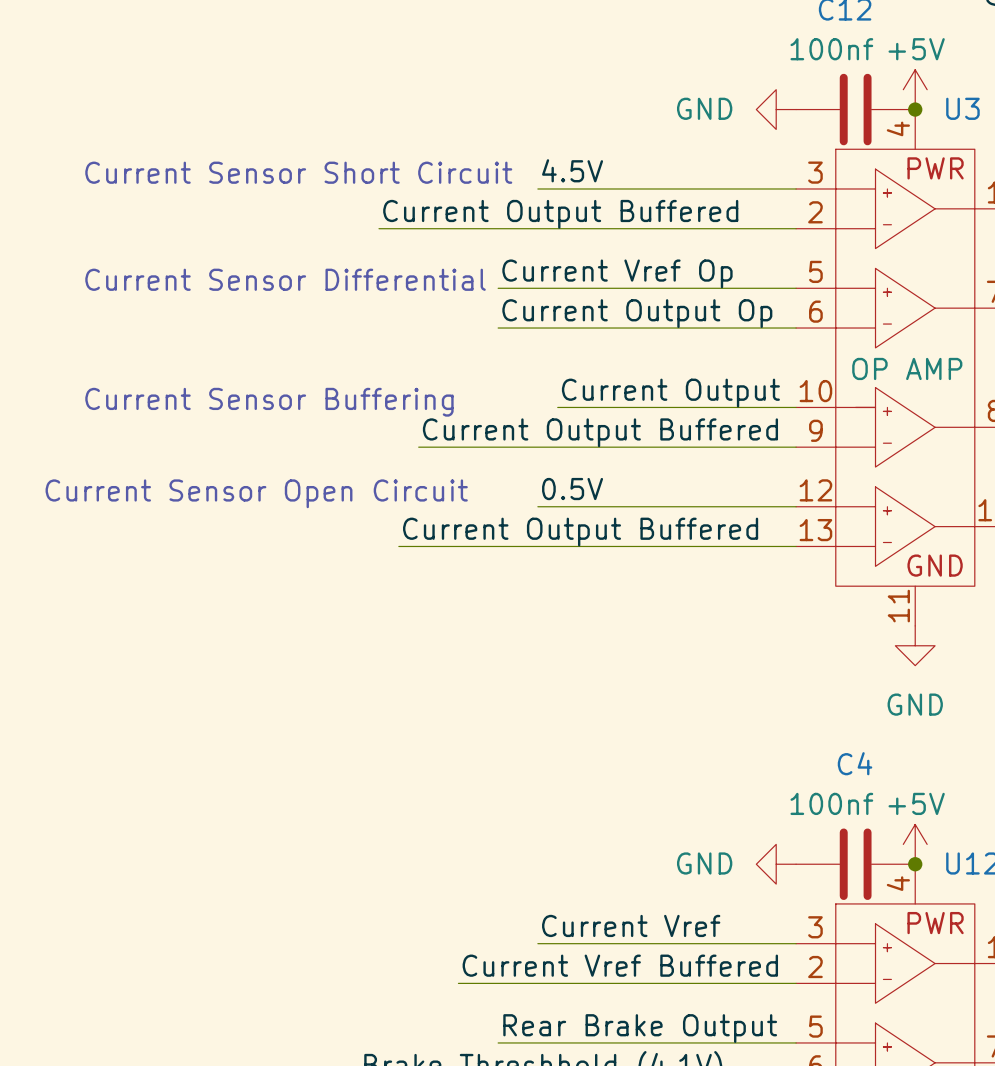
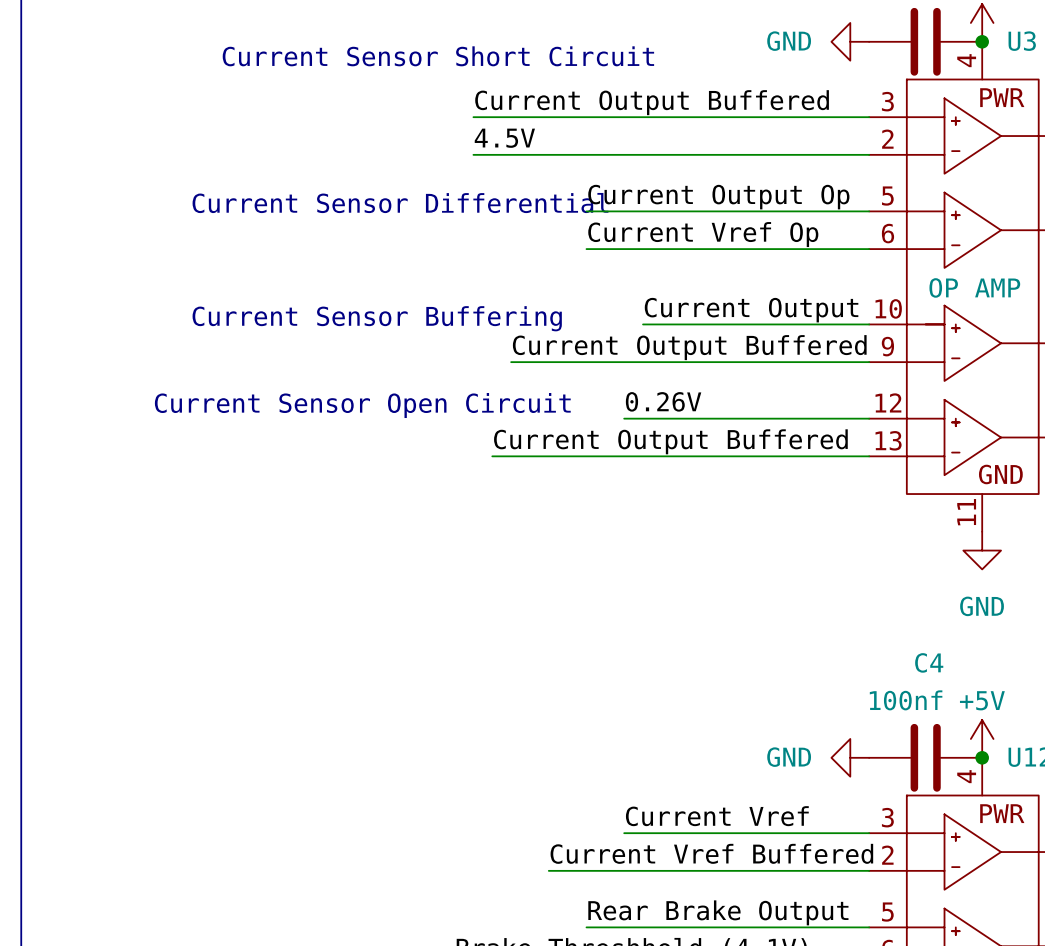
label: 4.5V (572, 170) -> none
text position: Current Sensor Short Circuit (298, 172) -> Current Sensor Short Circuit (438, 56)
label: none -> Current Output Buffered (652, 102)
wire: none -> (473, 117) (624, 117)
label: Current Output Buffered (560, 214) -> 4.5V (504, 138)
label: Current Vref Op (617, 273) -> Current Output Op (718, 197)
label: Current Output Op (637, 313) -> Current Vref Op (703, 234)
label: 0.5V (572, 489) -> 0.26V (663, 401)

